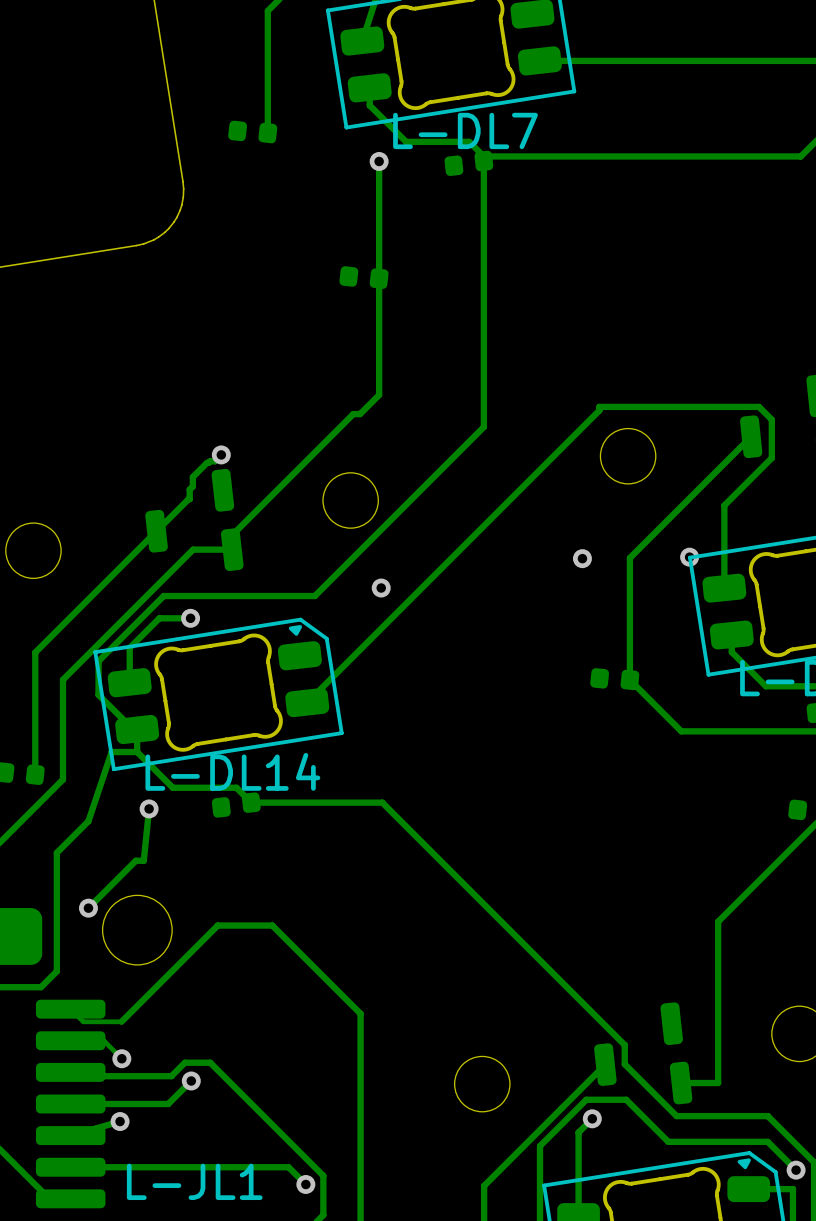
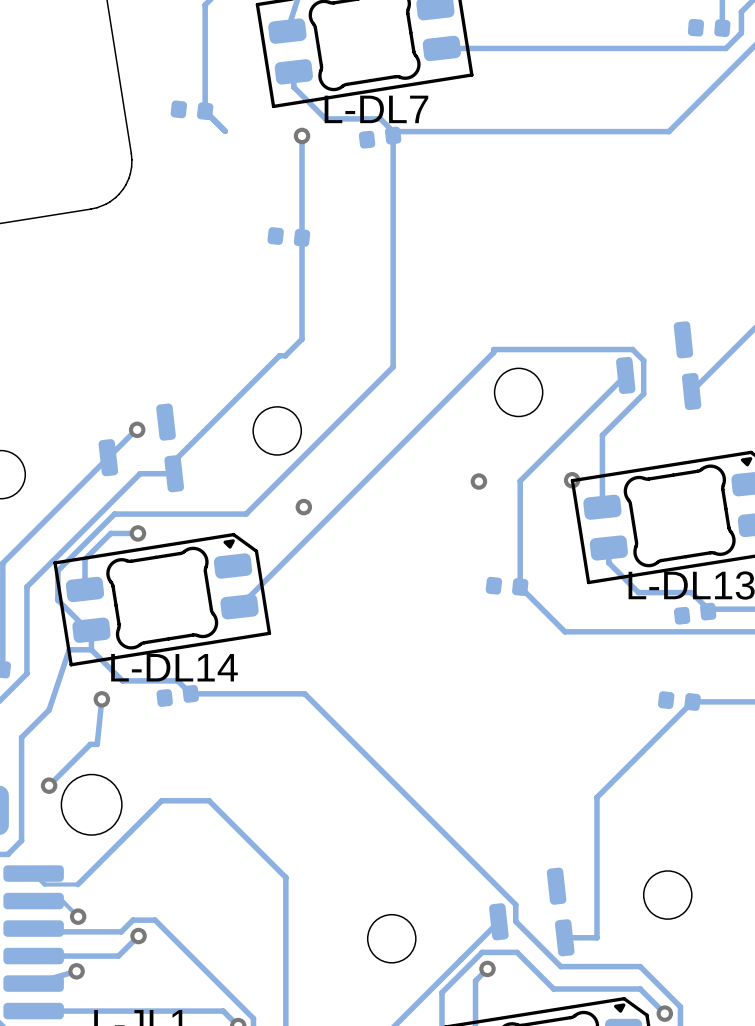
track: none -> (205, 111) (225, 131) (205, 111)
track: (221, 454) (215, 461) (207, 462) (192, 477) (189, 499) -> none
via position: (221, 454) -> (137, 429)

